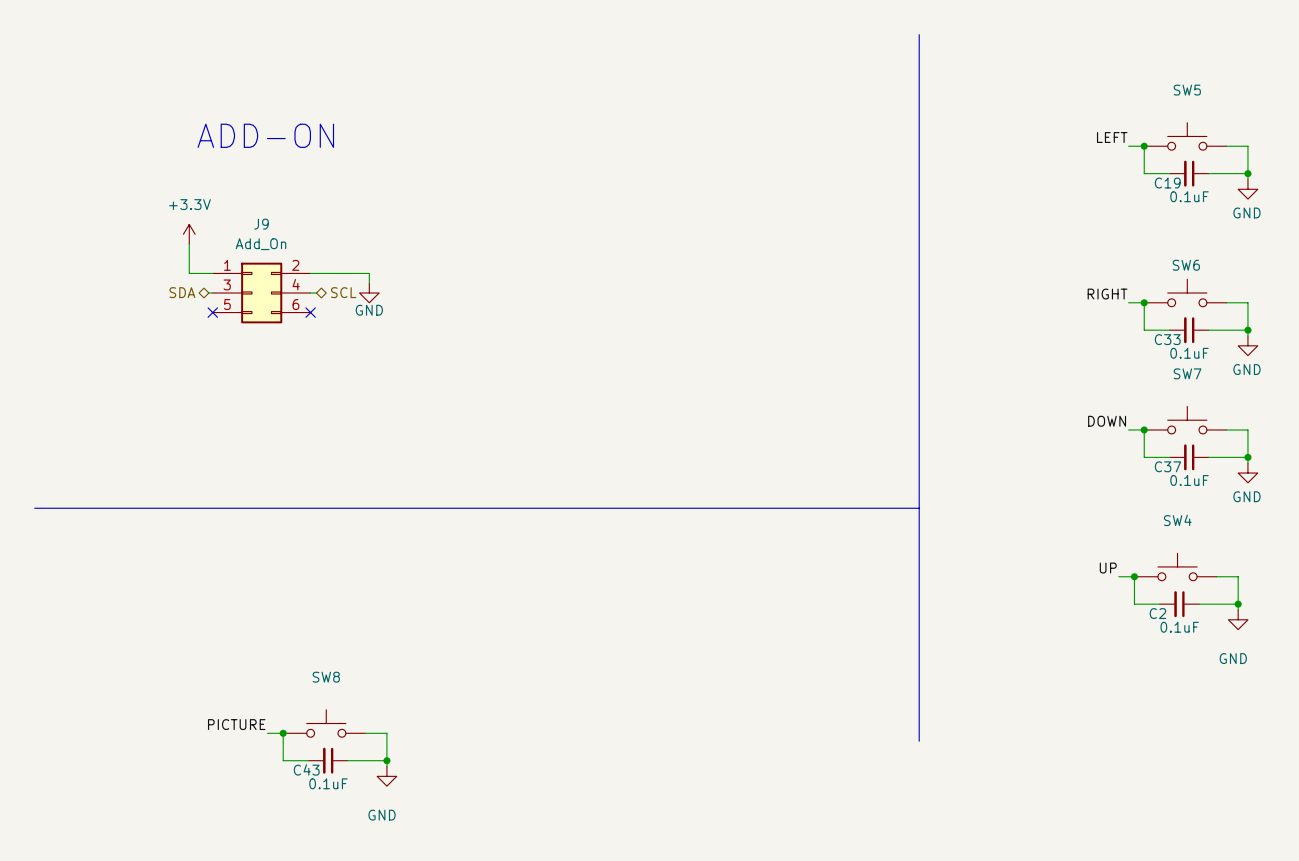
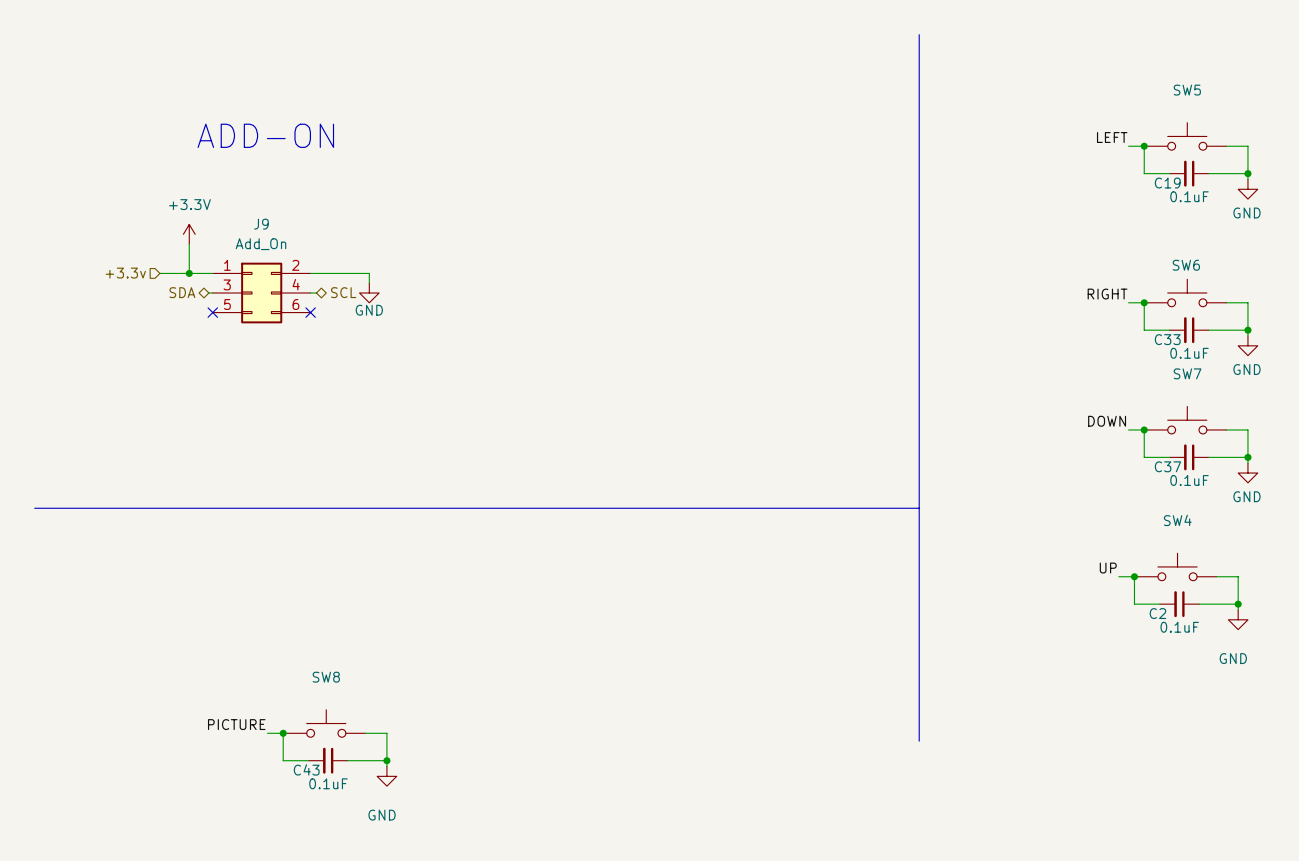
hierarchical label: none -> +3.3v (125, 273)
wire: none -> (159, 273) (189, 273)
junction: none -> (189, 273)

